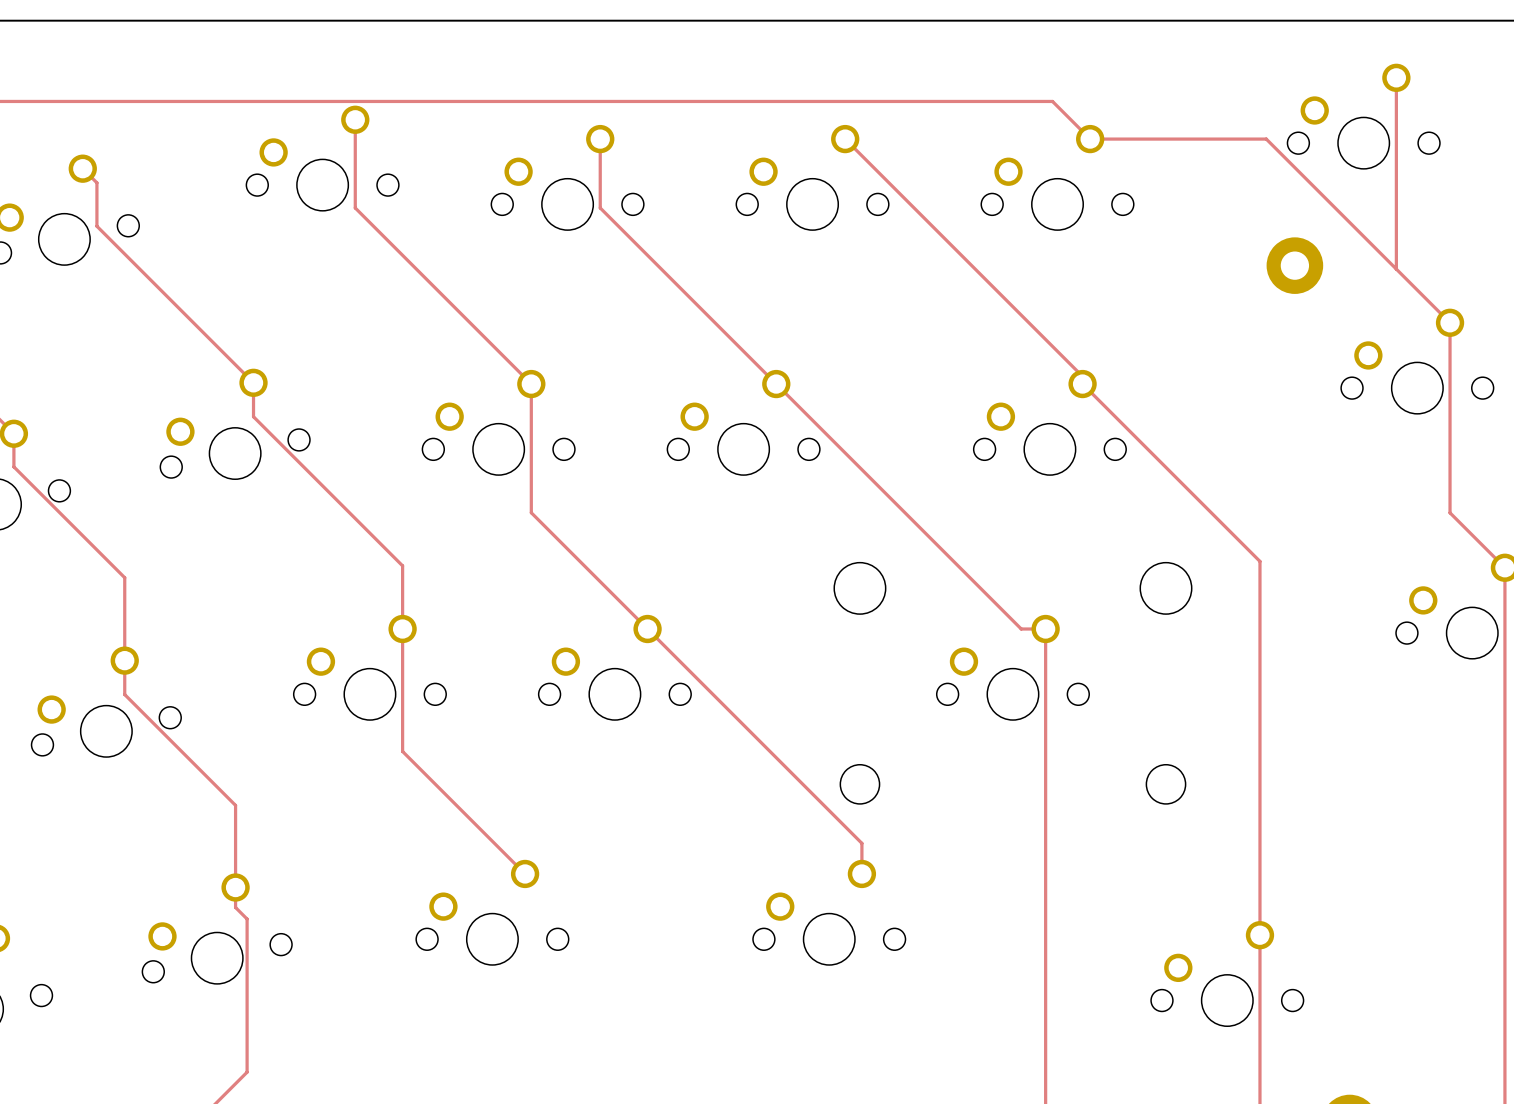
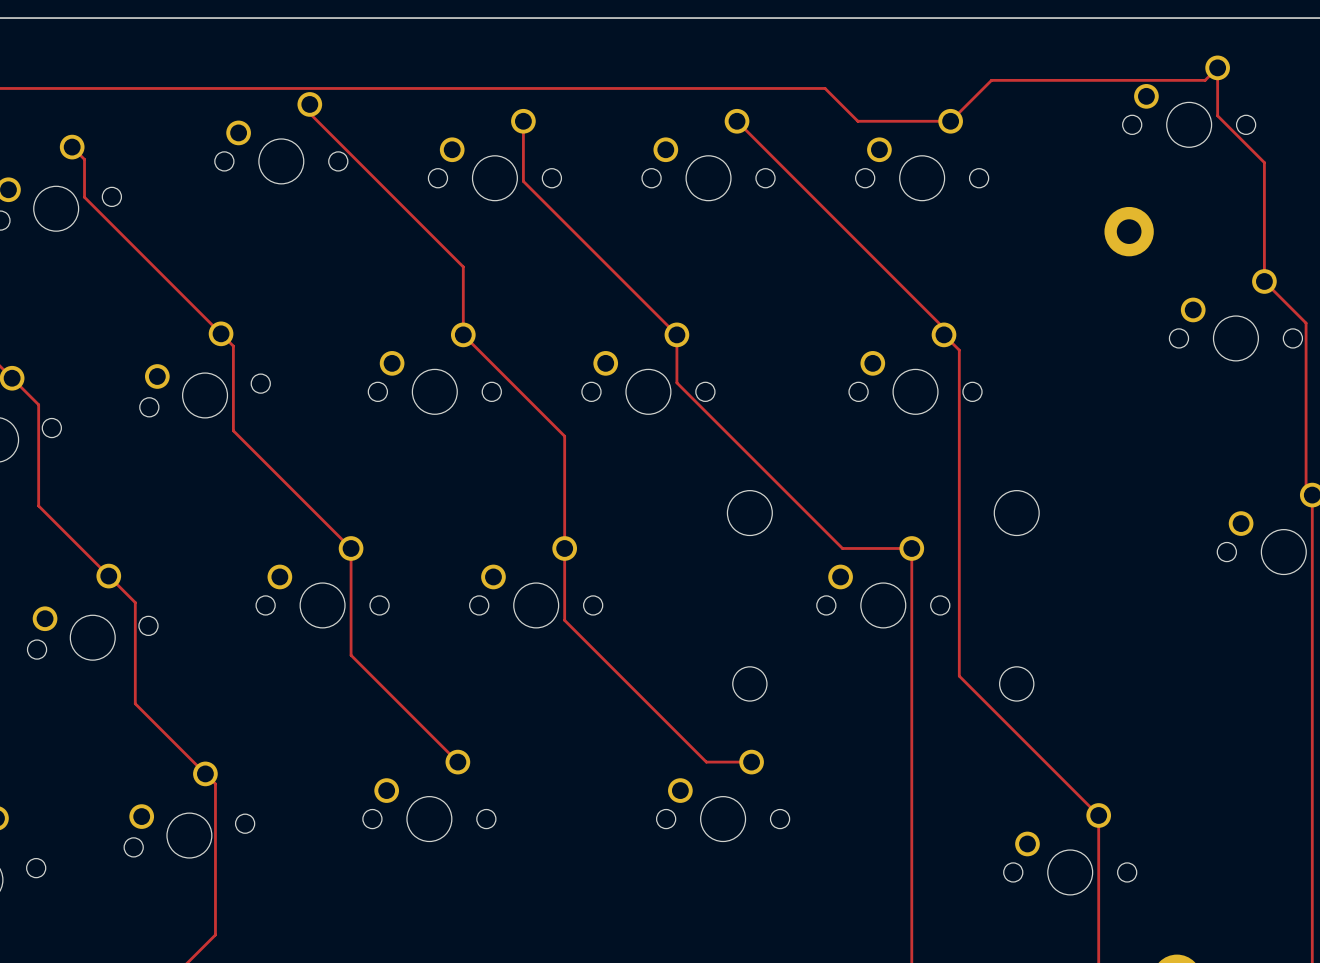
track: (946, 101) (1052, 101) (1090, 139) (1266, 139) (1450, 322) (1450, 512) (1497, 560) -> (825, 88) (857, 121) (950, 121) (991, 80) (1205, 80) (1217, 67)
track: (355, 130) (355, 208) (531, 384) (531, 512) (861, 843) (861, 873) -> (309, 113) (463, 266) (463, 334) (564, 436) (564, 620) (706, 762) (751, 762)
track: (1396, 132) (1396, 269) -> (1217, 115) (1264, 162) (1264, 281) (1306, 323) (1306, 488)
track: (96, 226) (253, 382) (253, 416) (402, 565) (402, 629) -> (84, 197) (233, 346) (233, 430) (351, 548)
track: (776, 384) (1021, 629) -> (676, 334) (676, 382) (842, 548) (890, 548)
track: (1082, 384) (1259, 561) (1259, 935) -> (944, 334) (959, 350) (959, 676) (1098, 815)
track: (13, 433) (13, 466) (124, 577) (124, 694) (235, 805) (235, 907) (247, 919) -> (12, 378) (38, 404) (38, 505) (135, 602) (135, 703) (215, 783) (215, 801)

